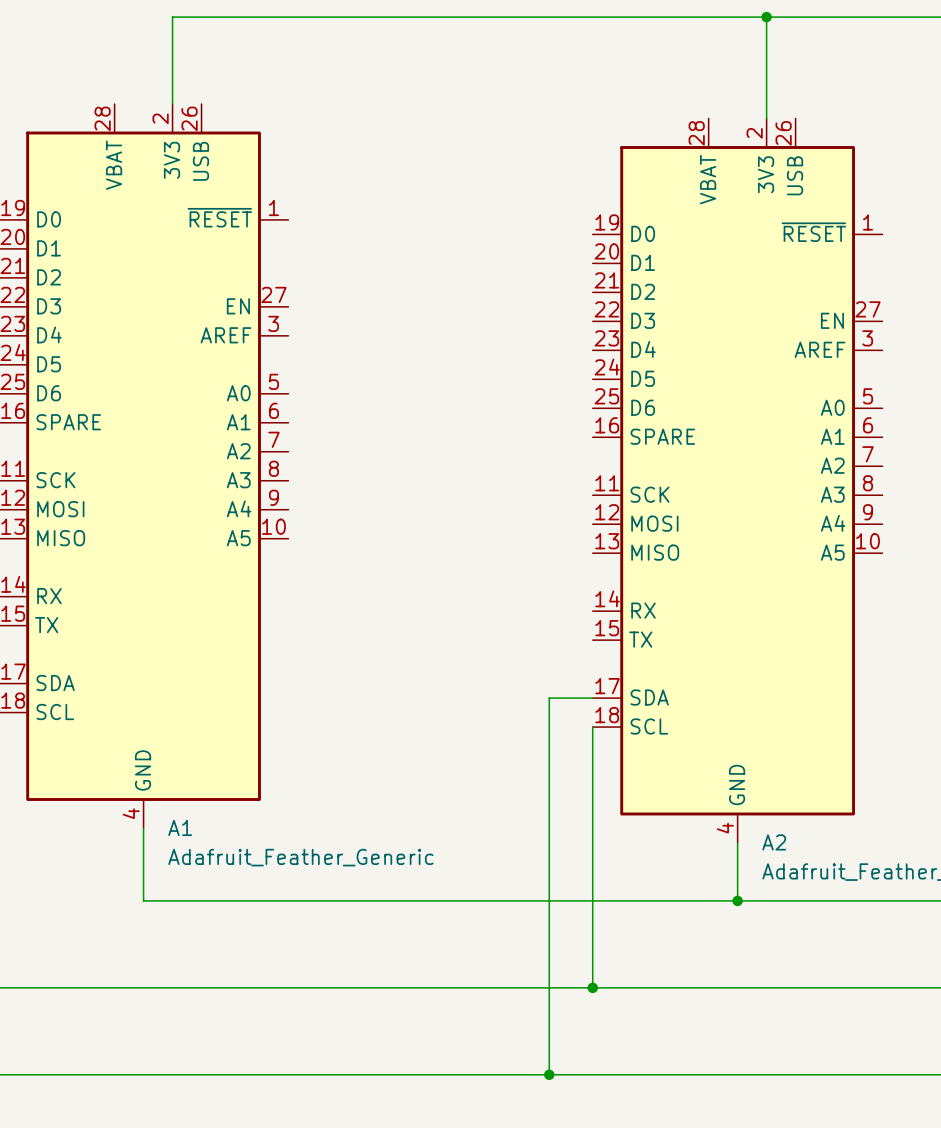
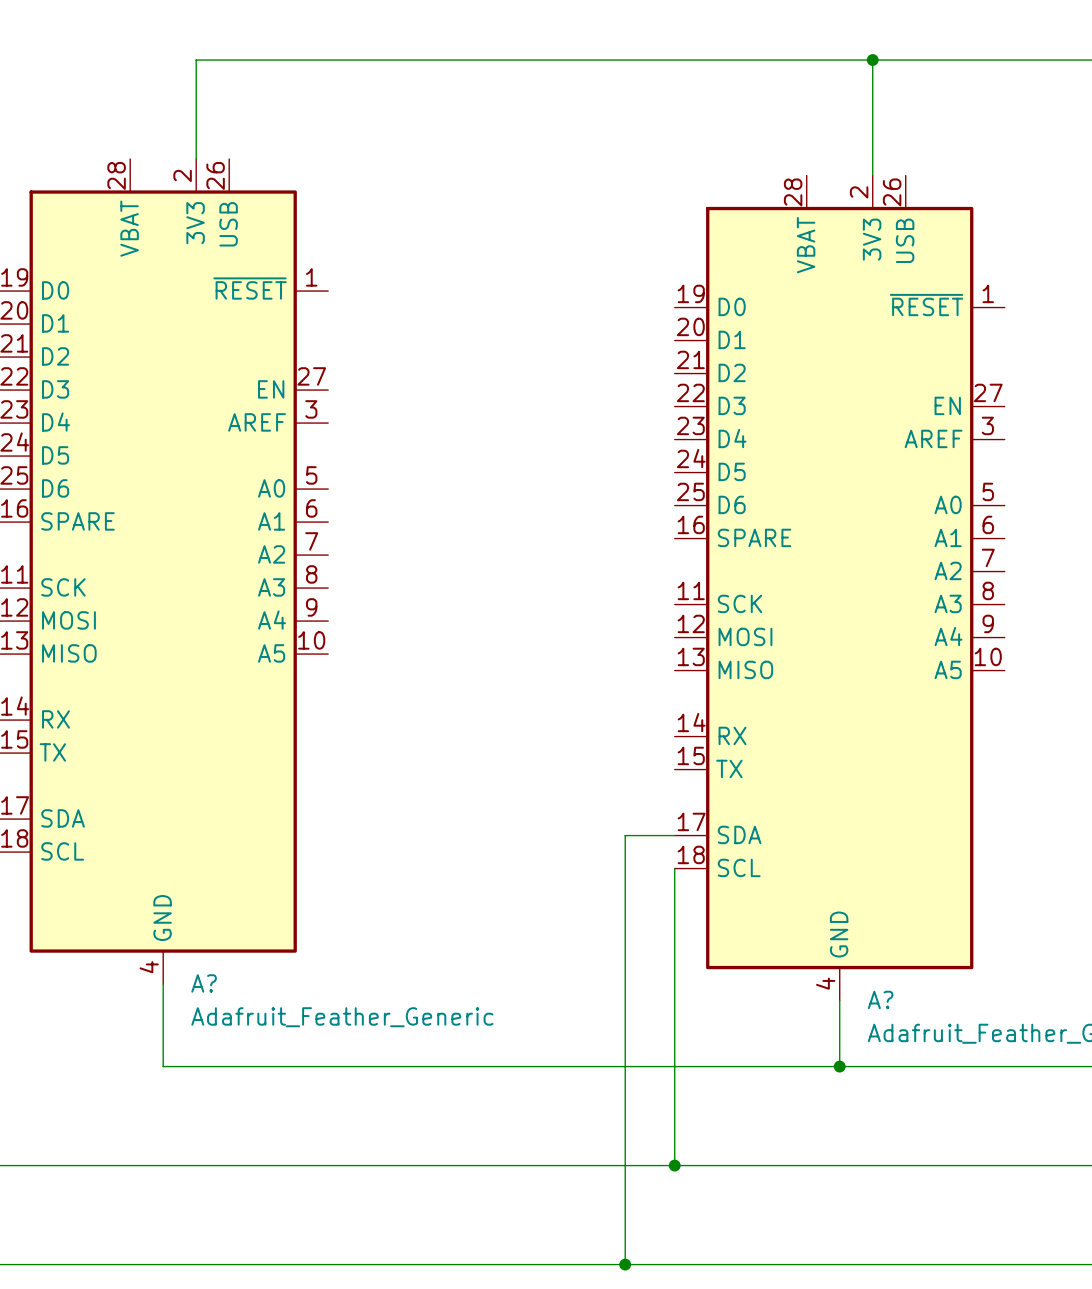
A1 name: A1 (180, 827) -> A? (204, 983)
A2 name: A2 (774, 842) -> A? (880, 999)

